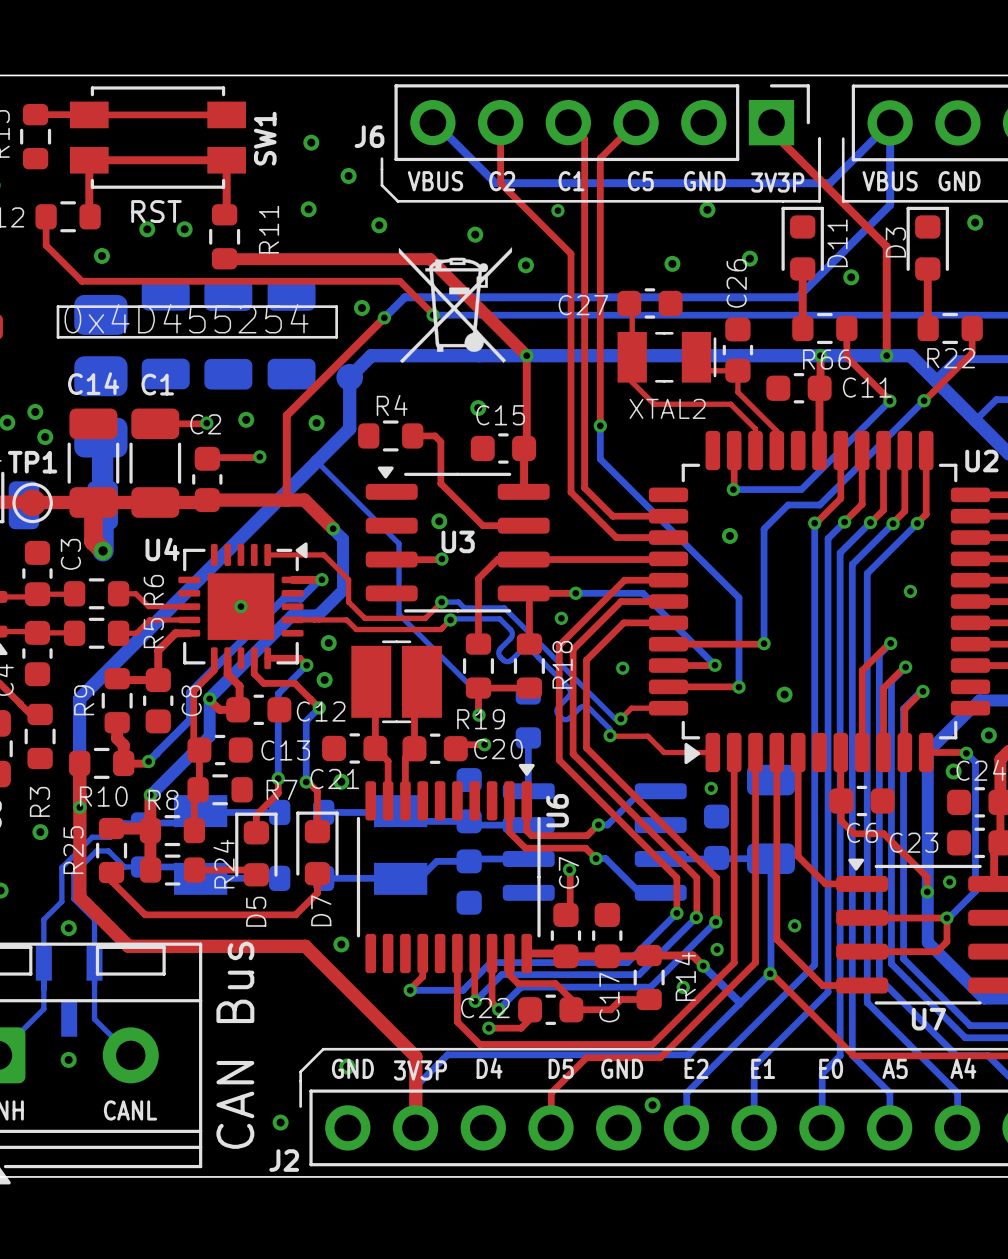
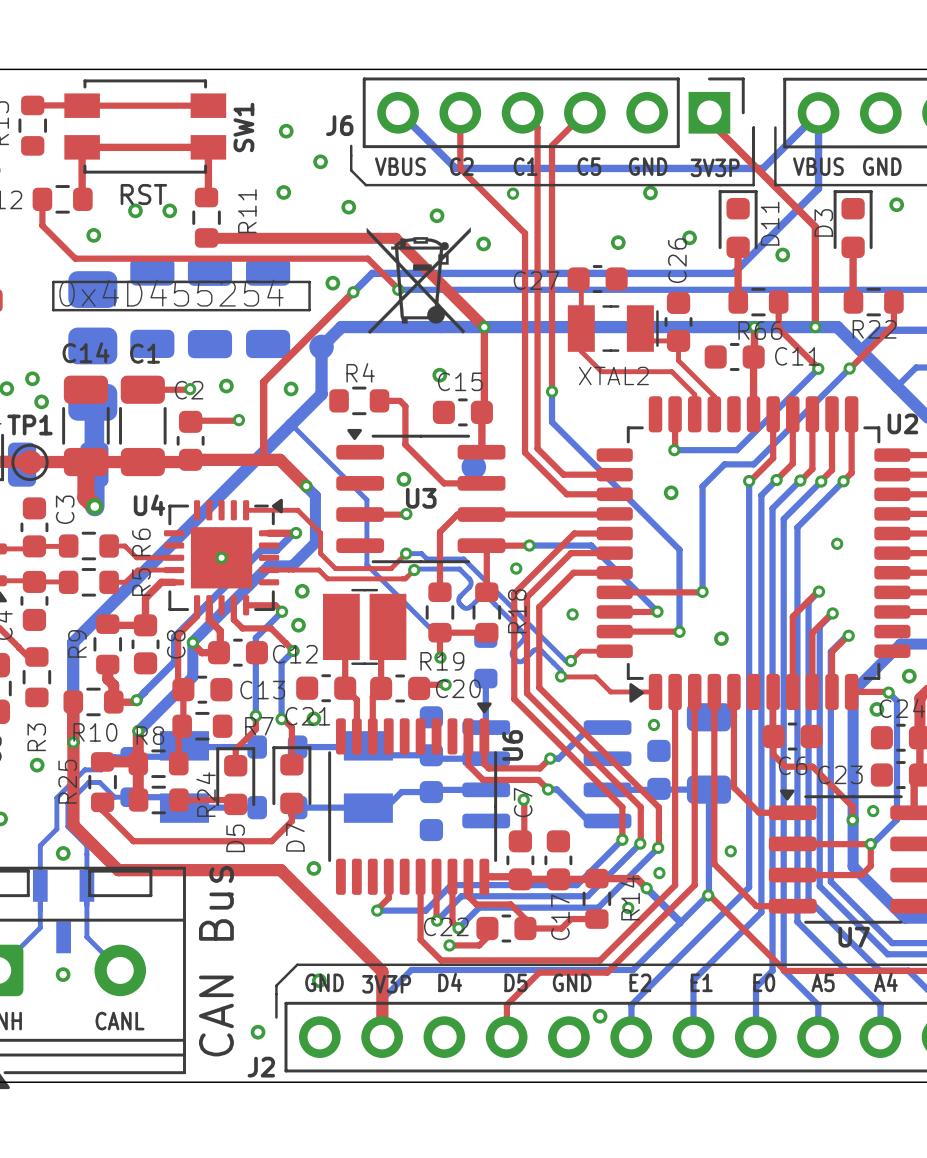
part: none -> (473, 467)

